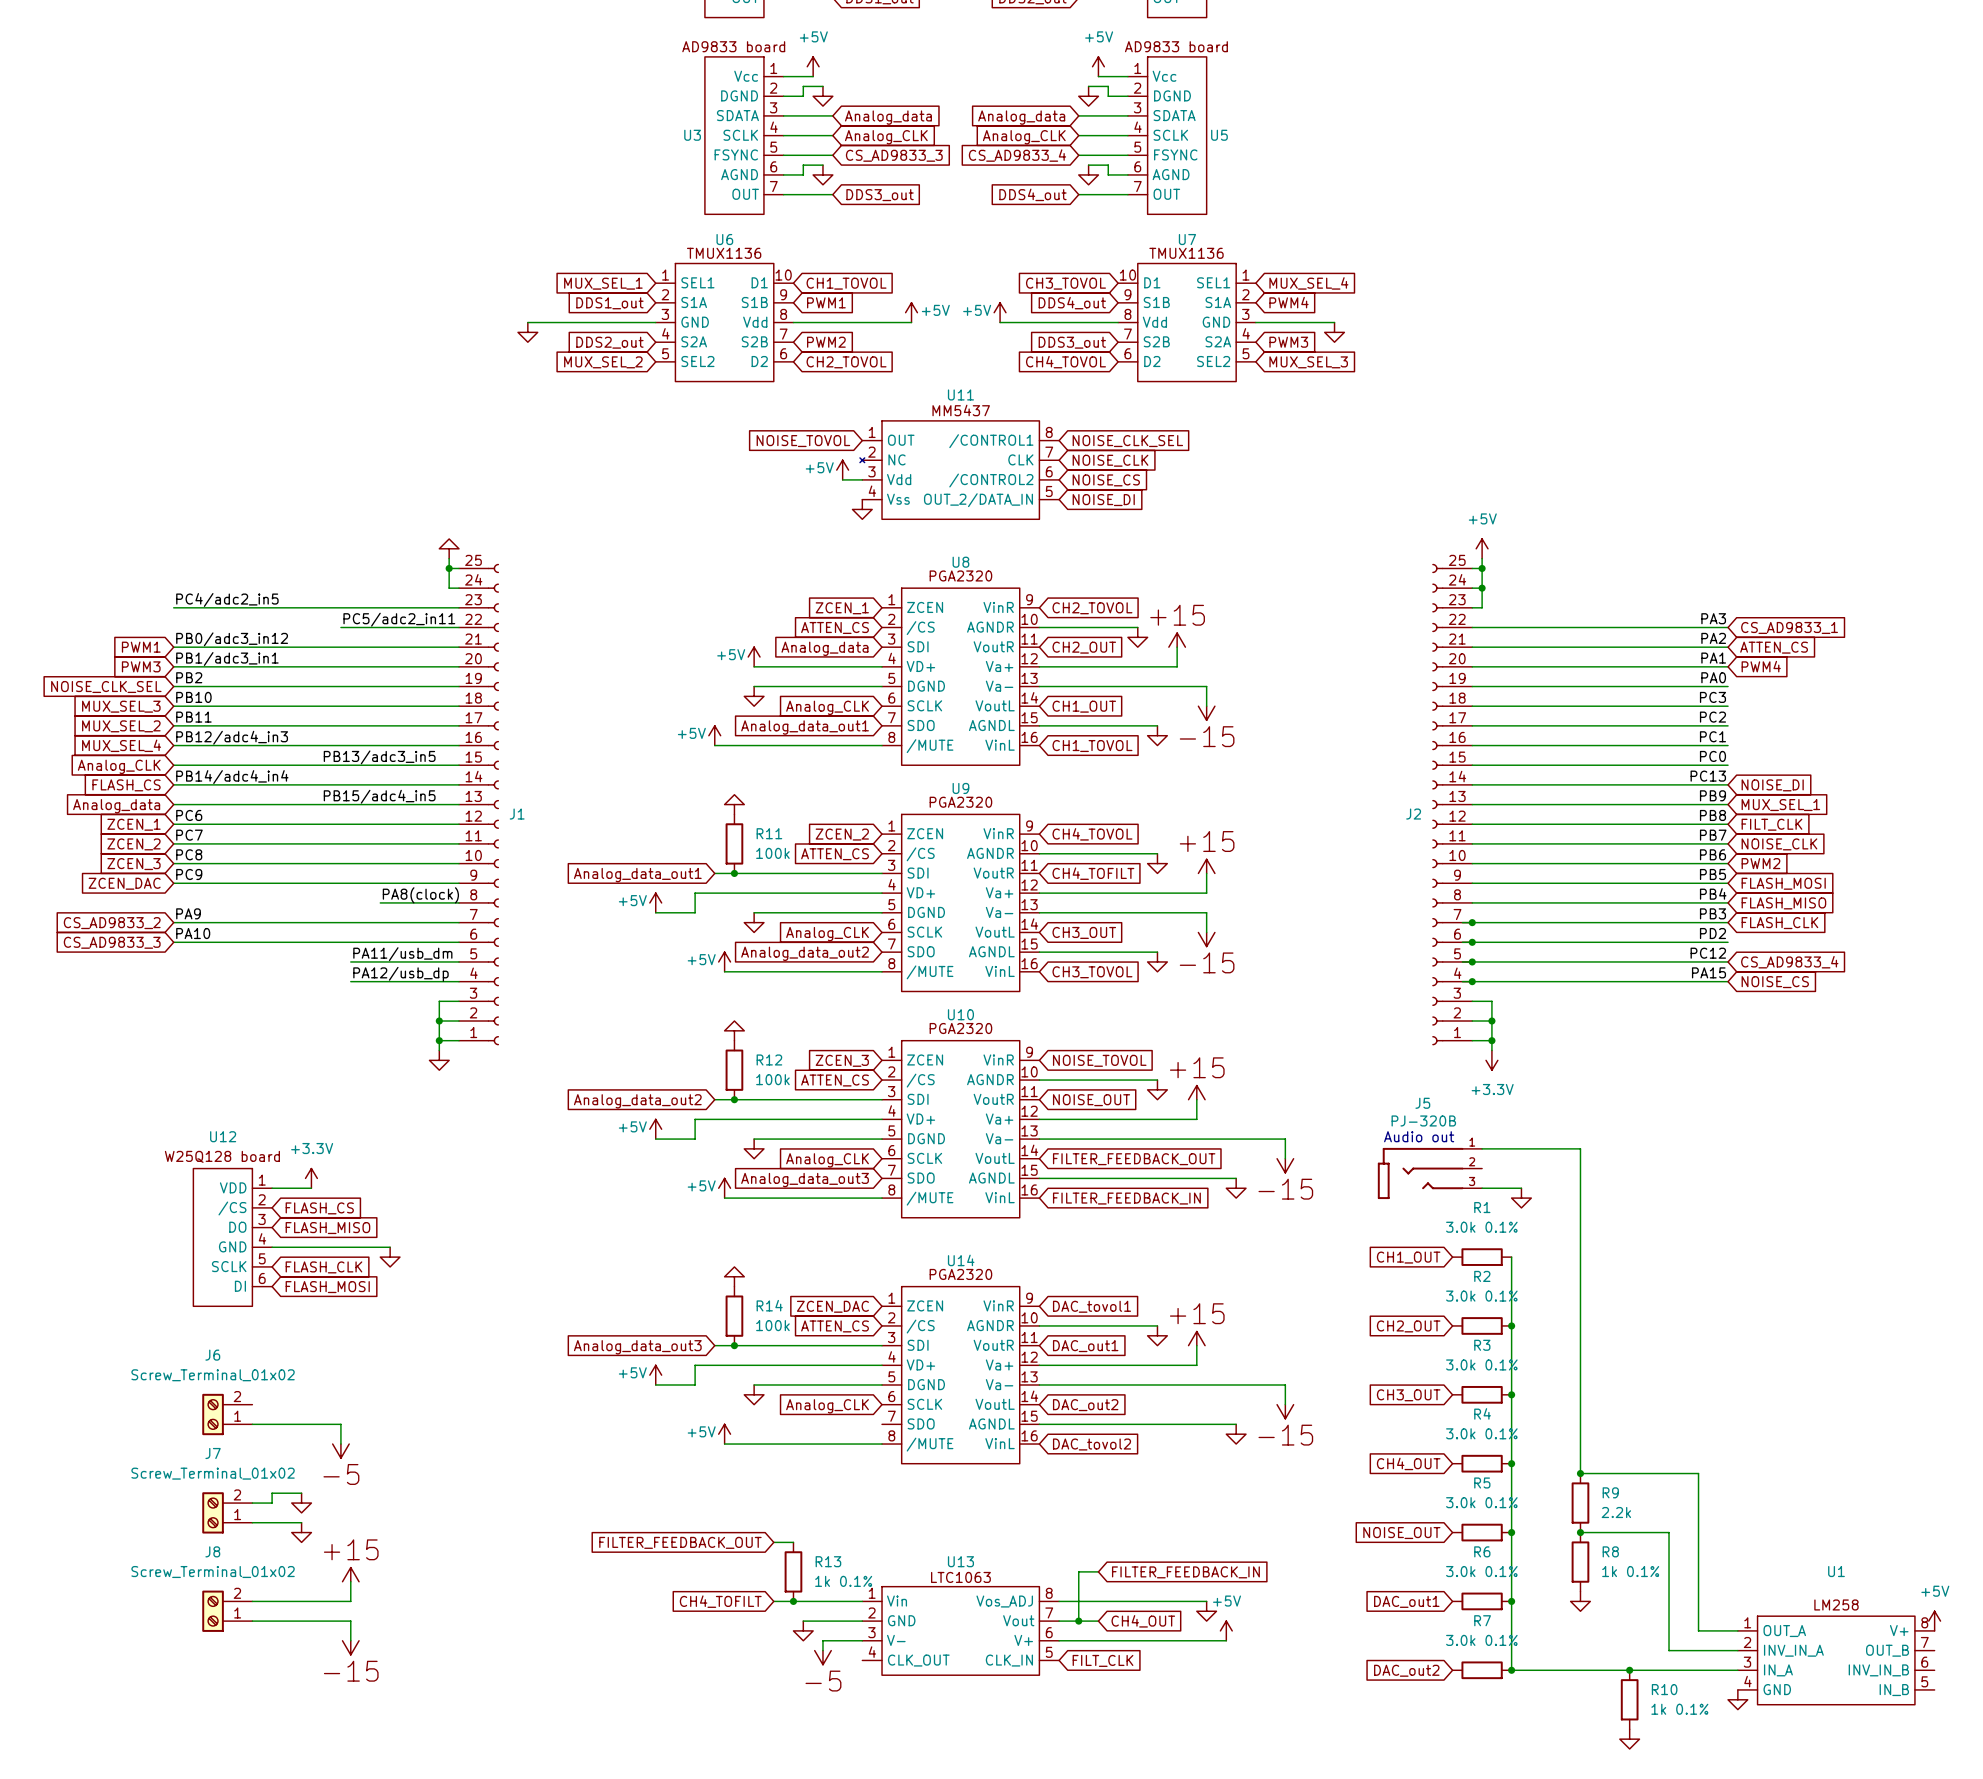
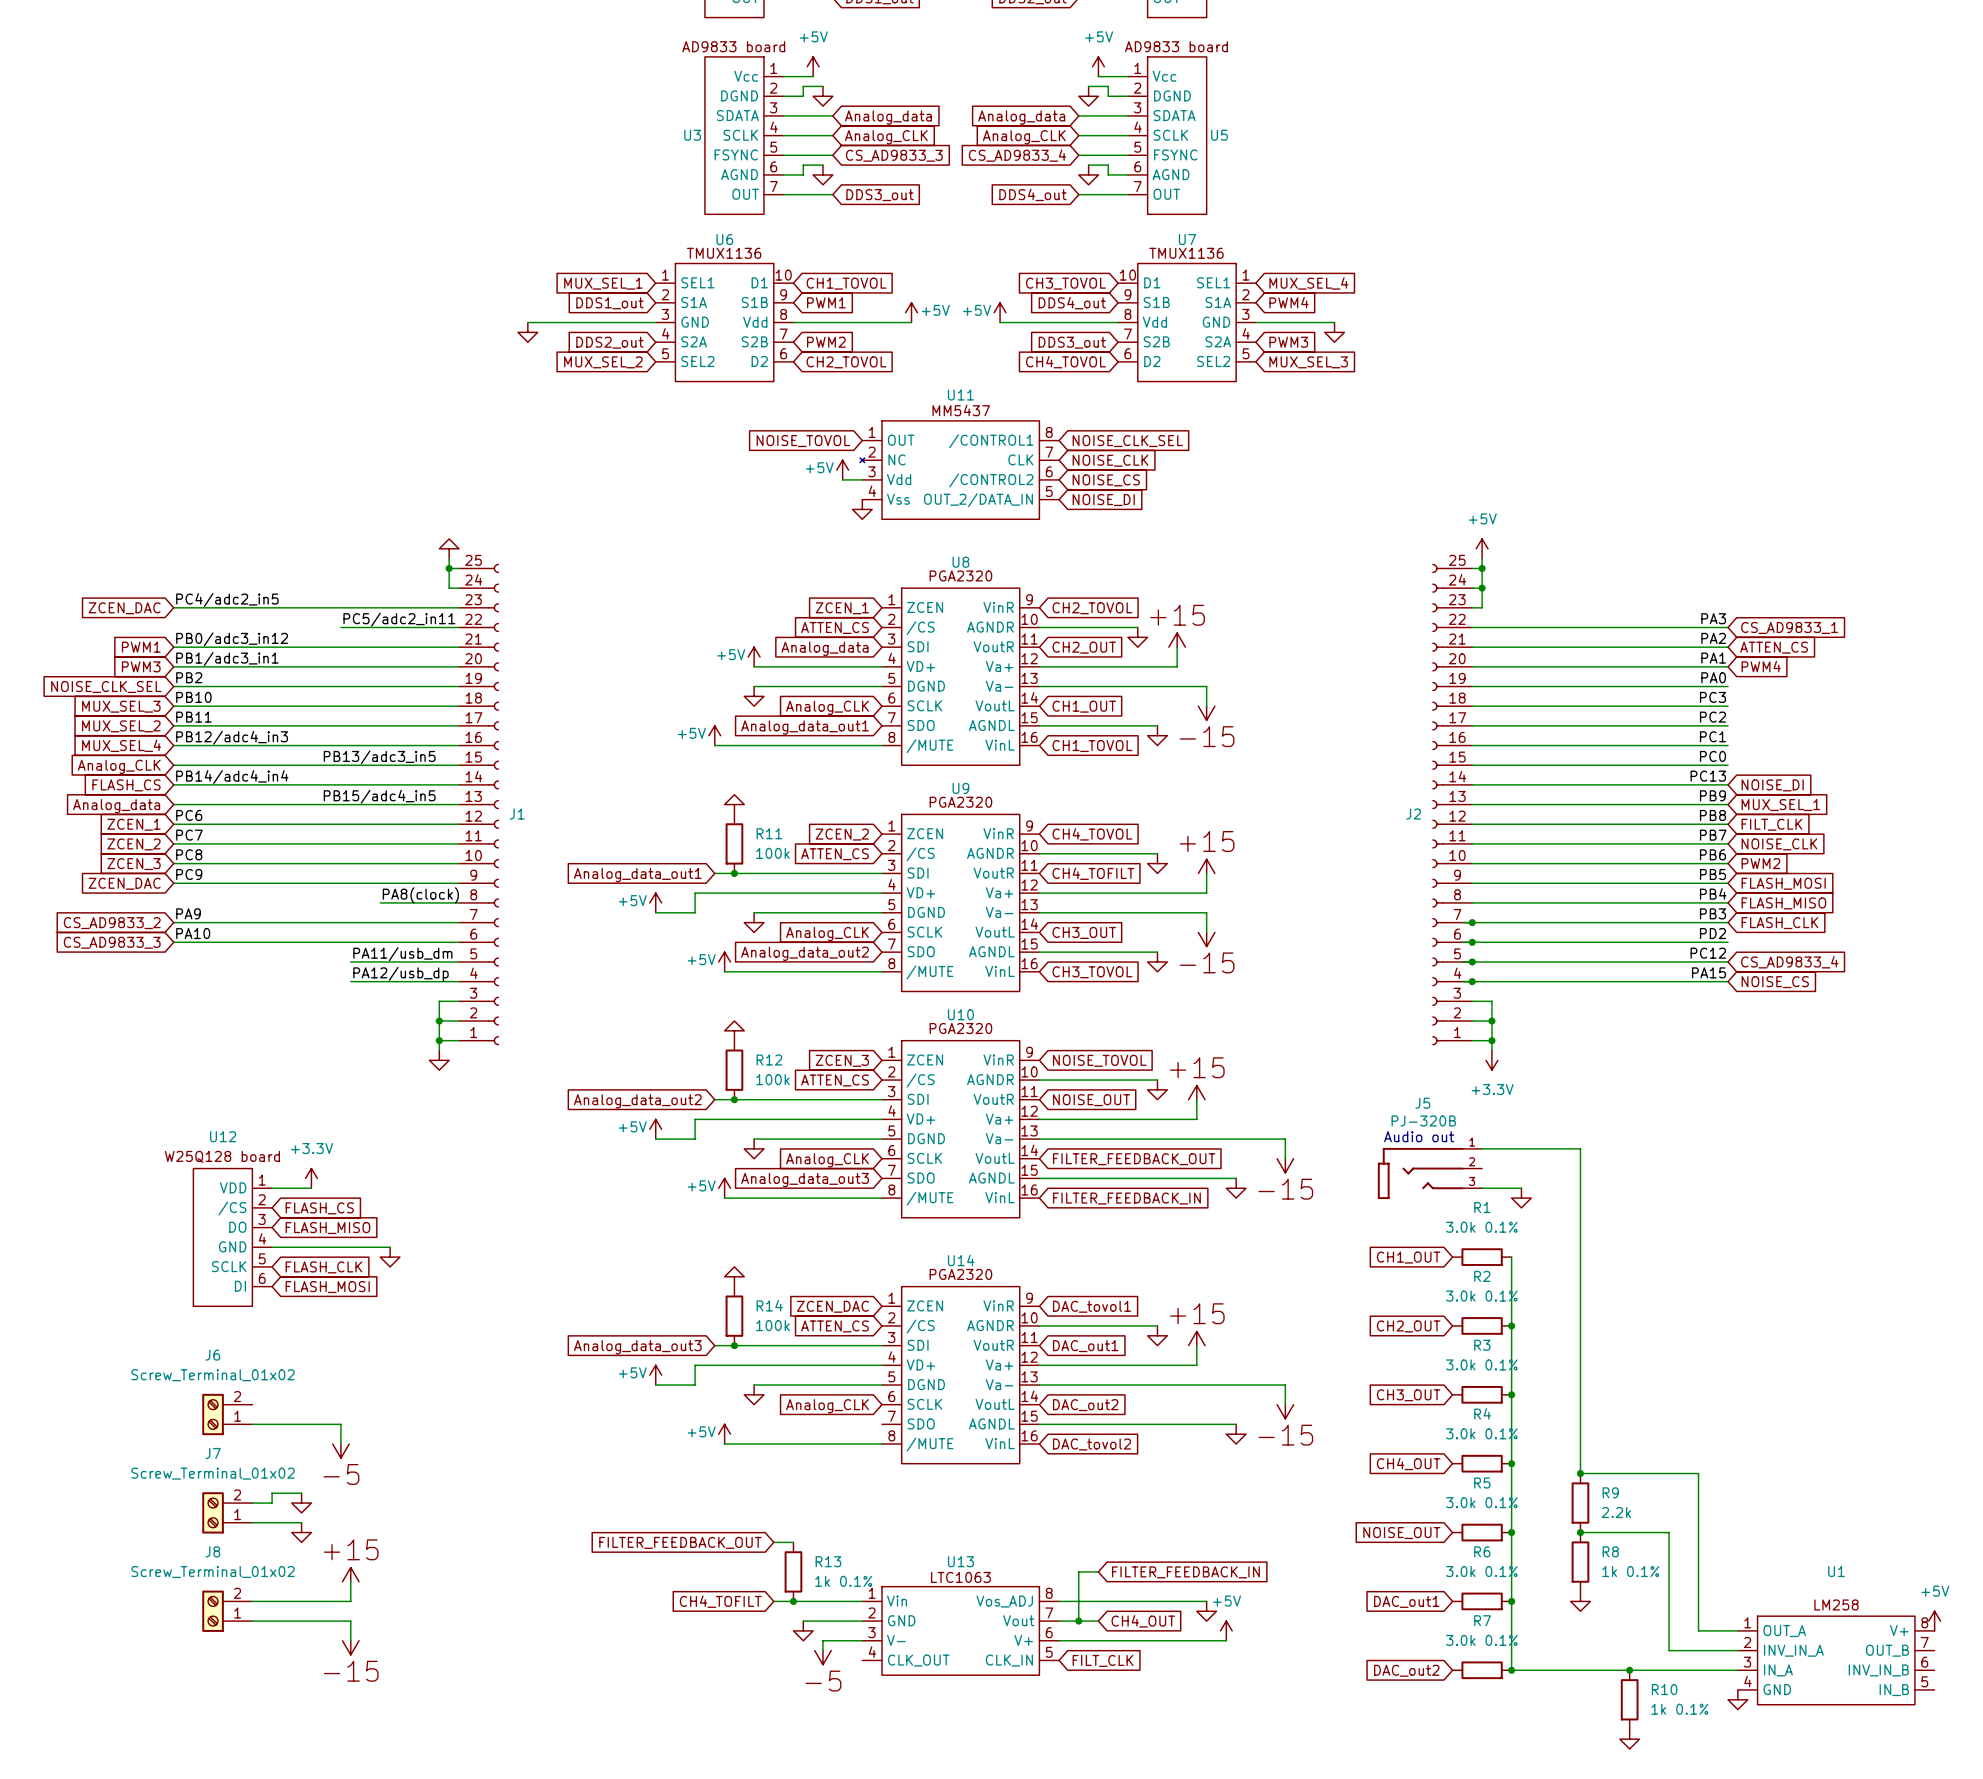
global label: none -> ZCEN_DAC (124, 608)

